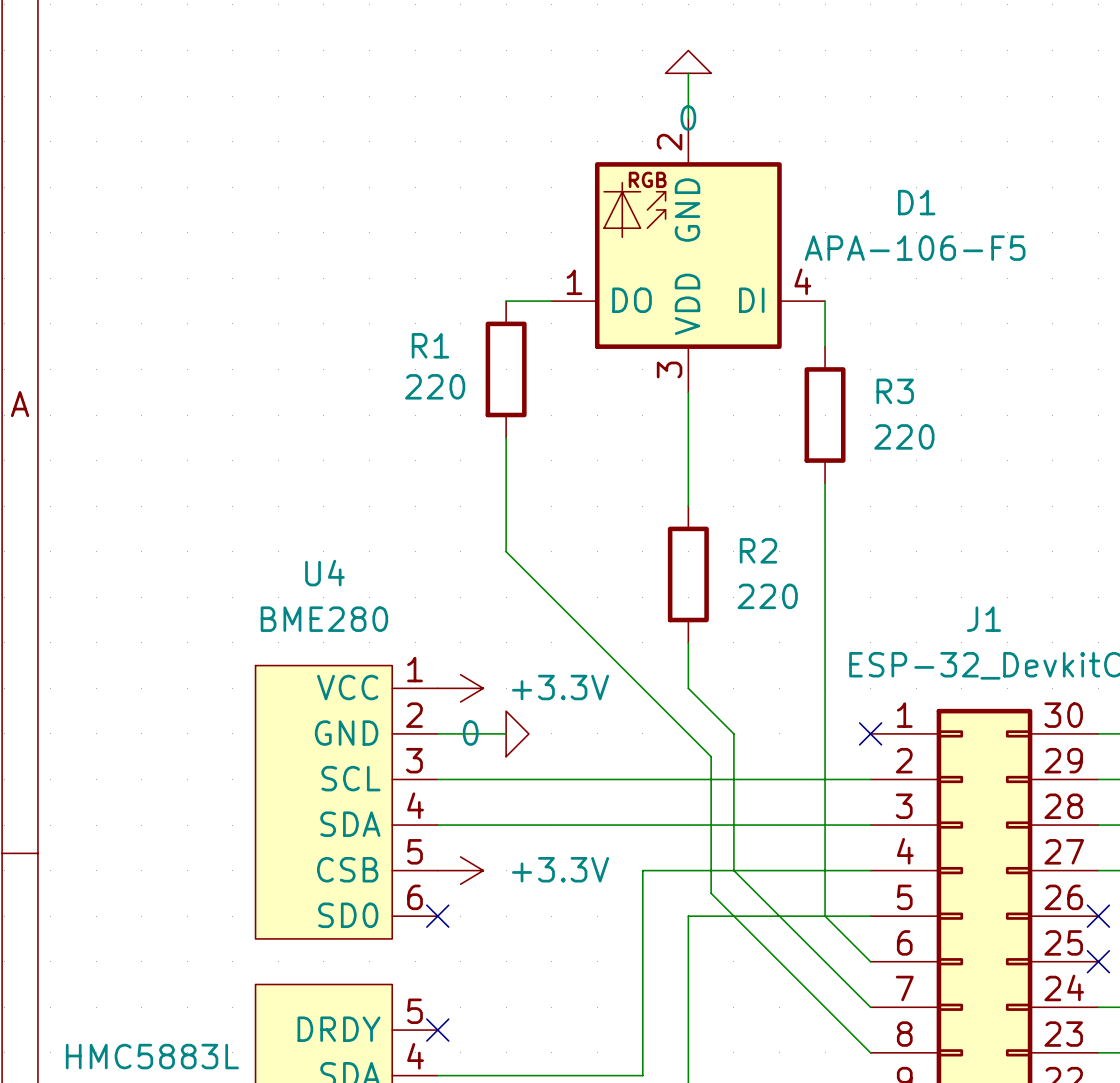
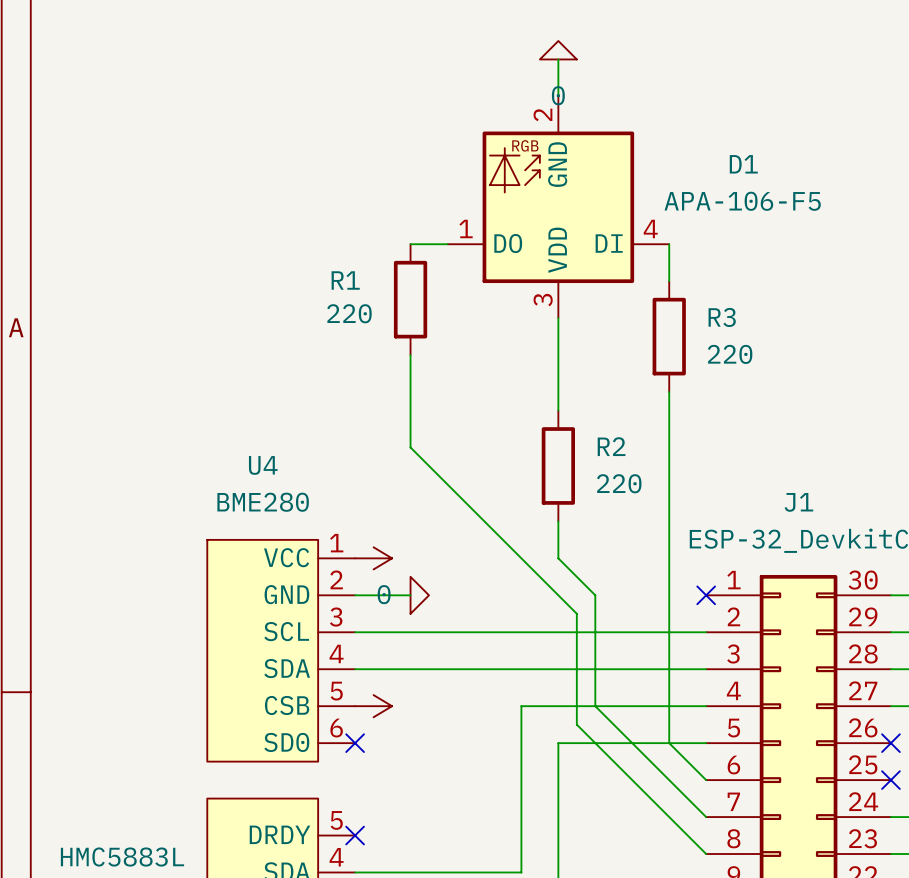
power symbol text: +3.3V (560, 687) -> none
power symbol text: +3.3V (560, 869) -> none

